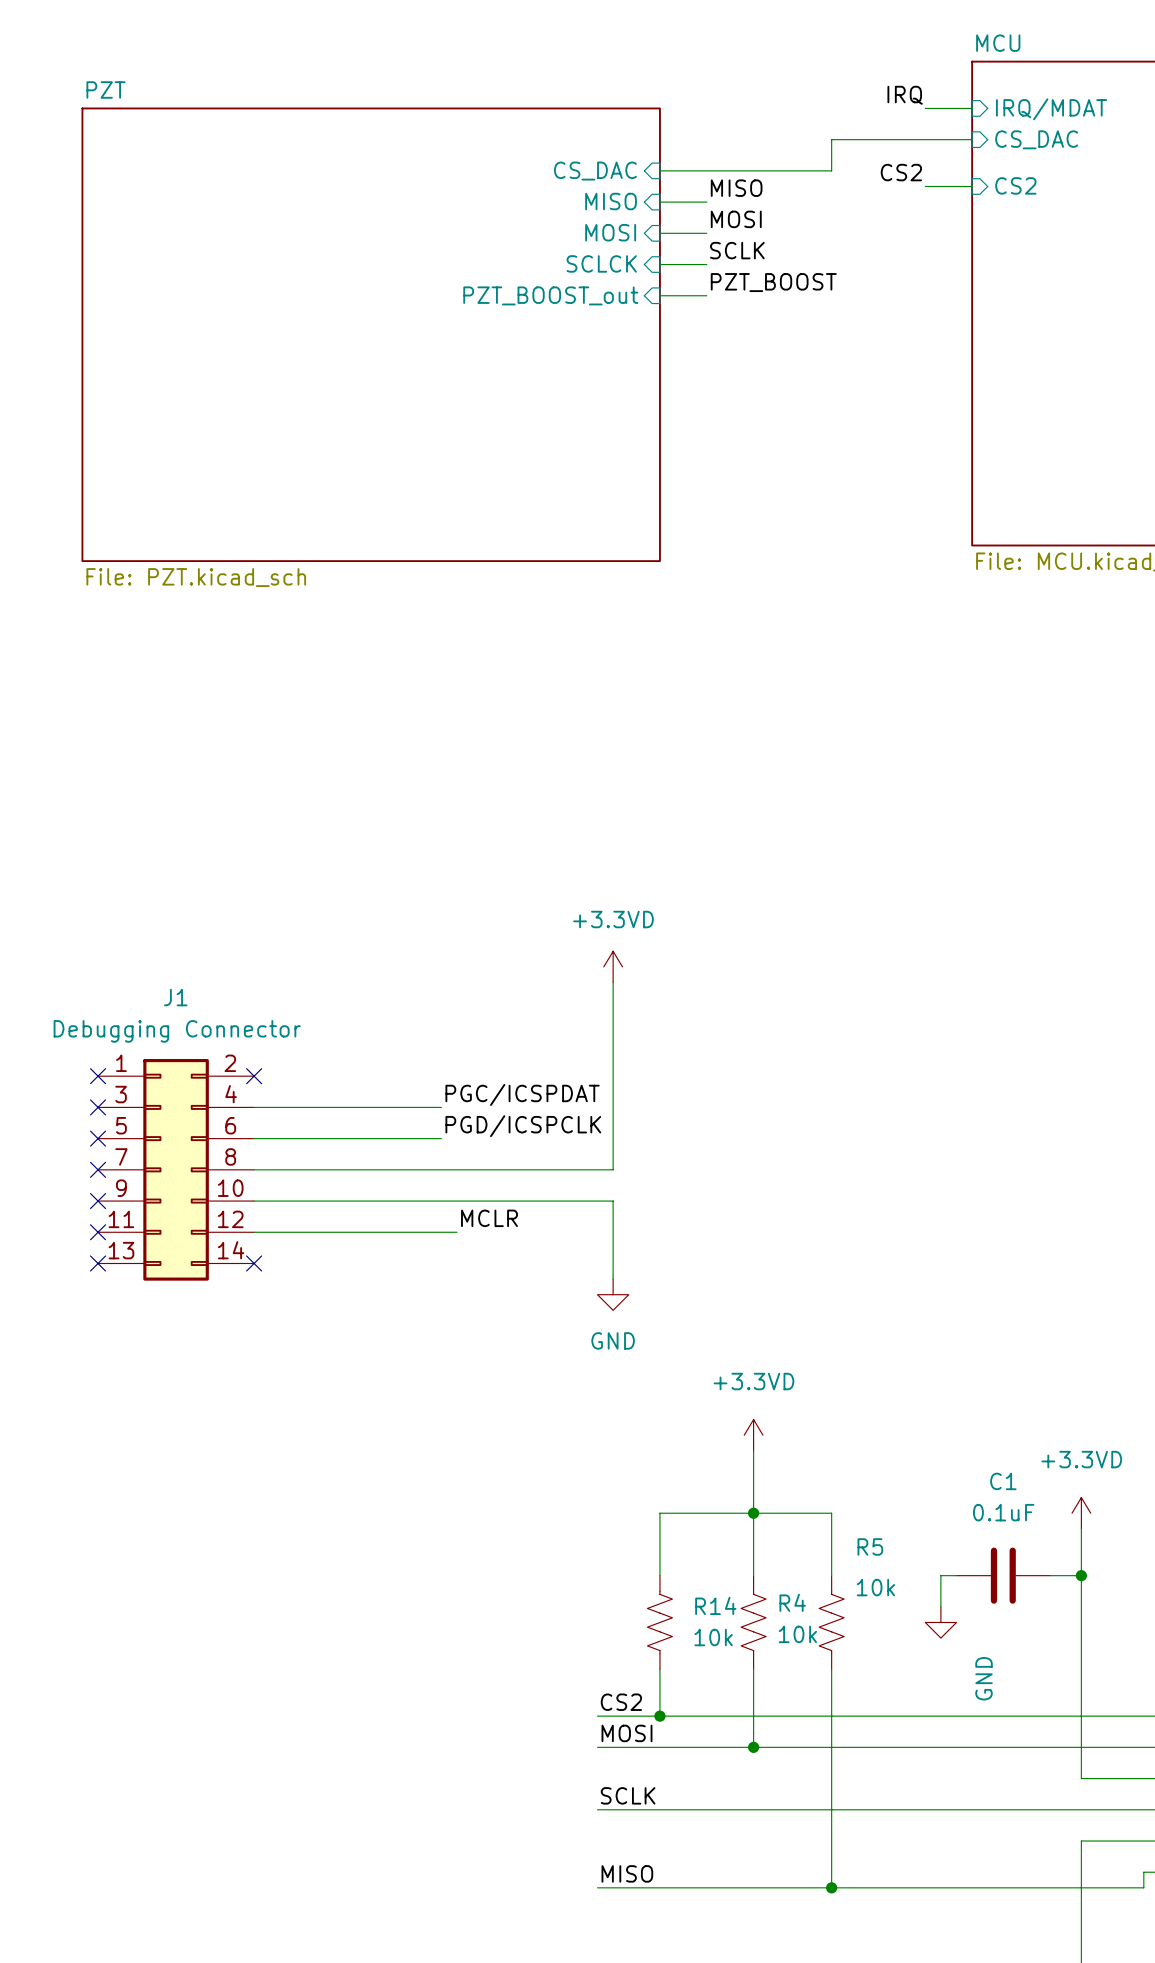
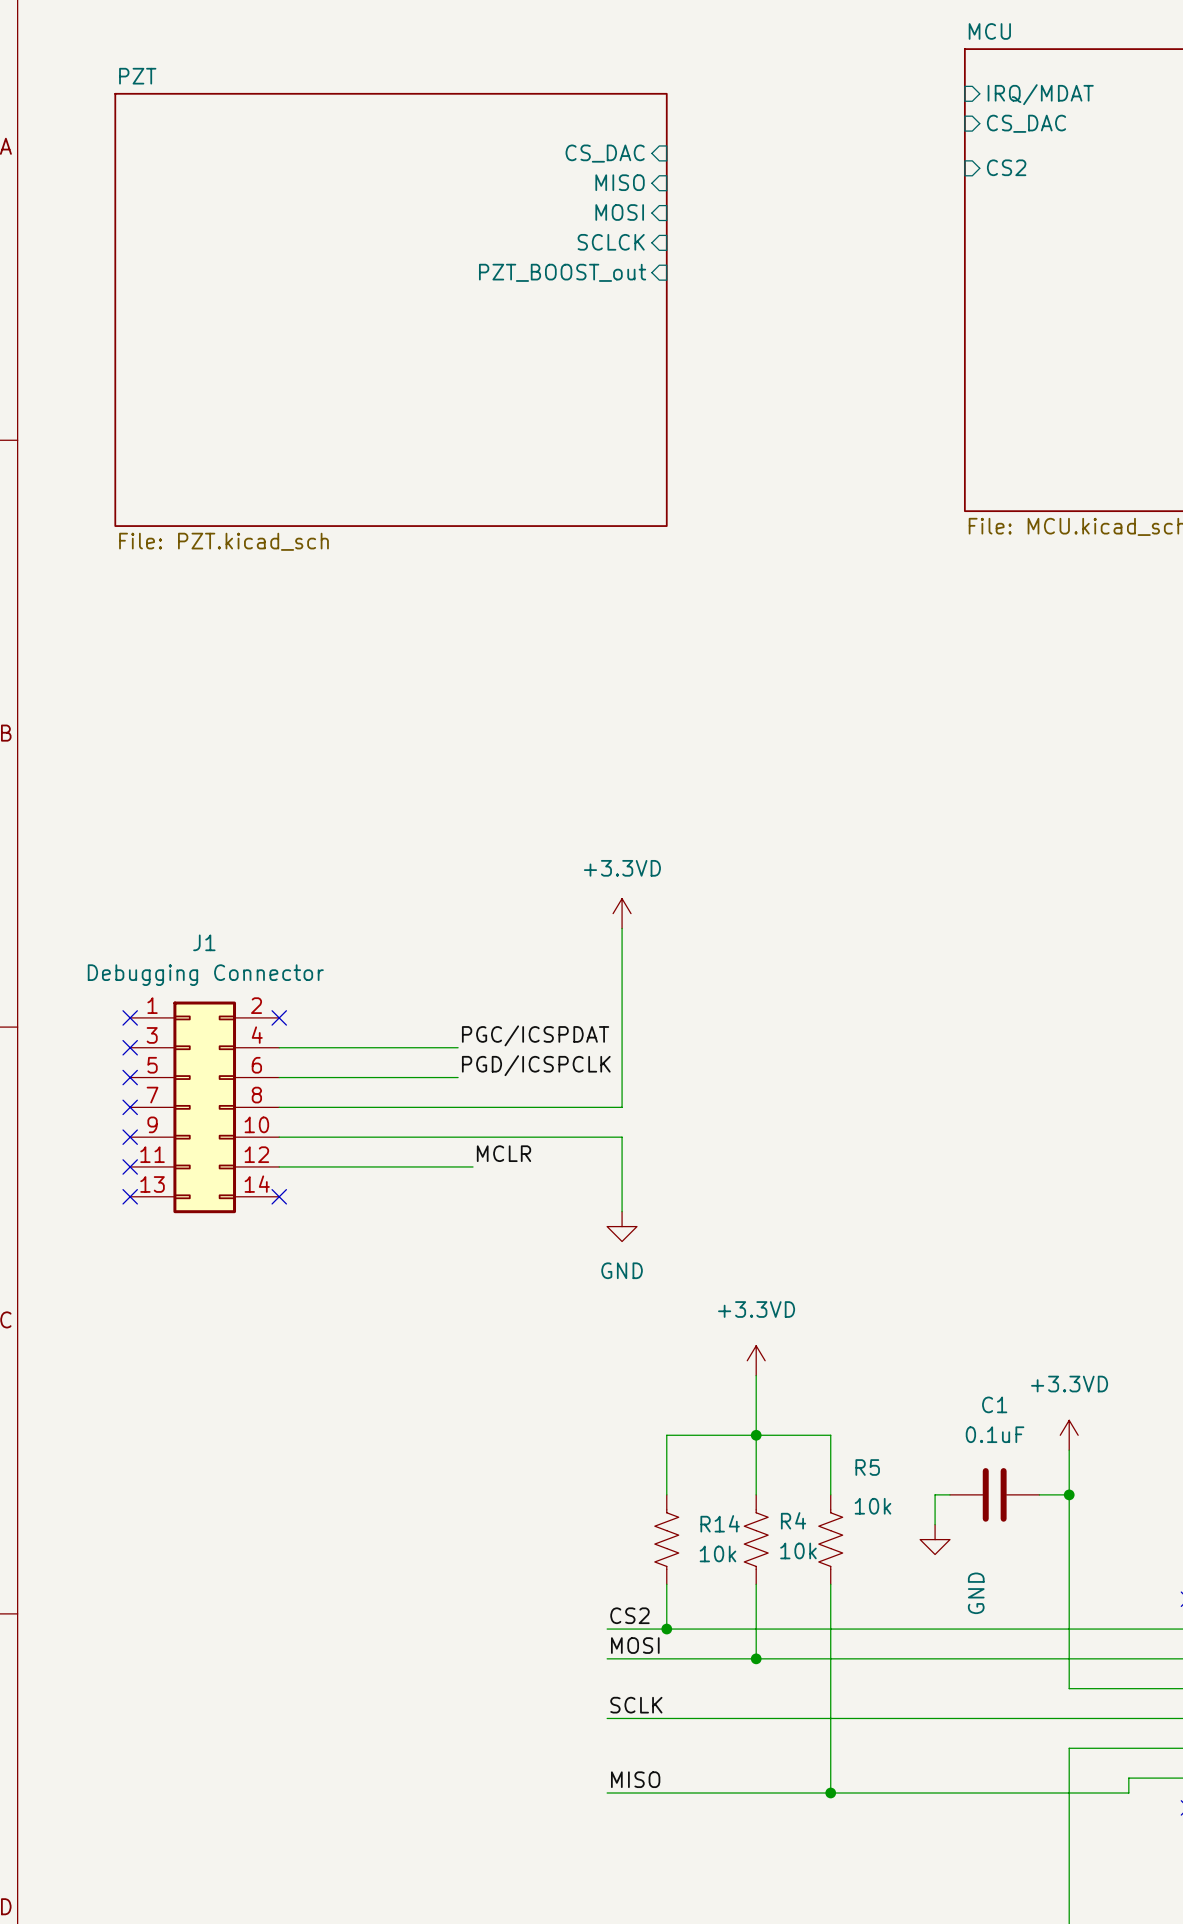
label: IRQ (905, 95) -> none
wire: (925, 108) (972, 108) -> none
wire: (972, 139) (831, 139) (831, 170) (659, 170) -> none
label: CS2 (901, 172) -> none
wire: (925, 186) (972, 186) -> none
label: MISO (736, 188) -> none
wire: (659, 202) (706, 202) -> none
label: MOSI (736, 219) -> none
wire: (659, 233) (706, 233) -> none
label: SCLK (737, 250) -> none
wire: (659, 264) (706, 264) -> none
label: PZT_BOOST (773, 282) -> none
wire: (659, 295) (706, 295) -> none

